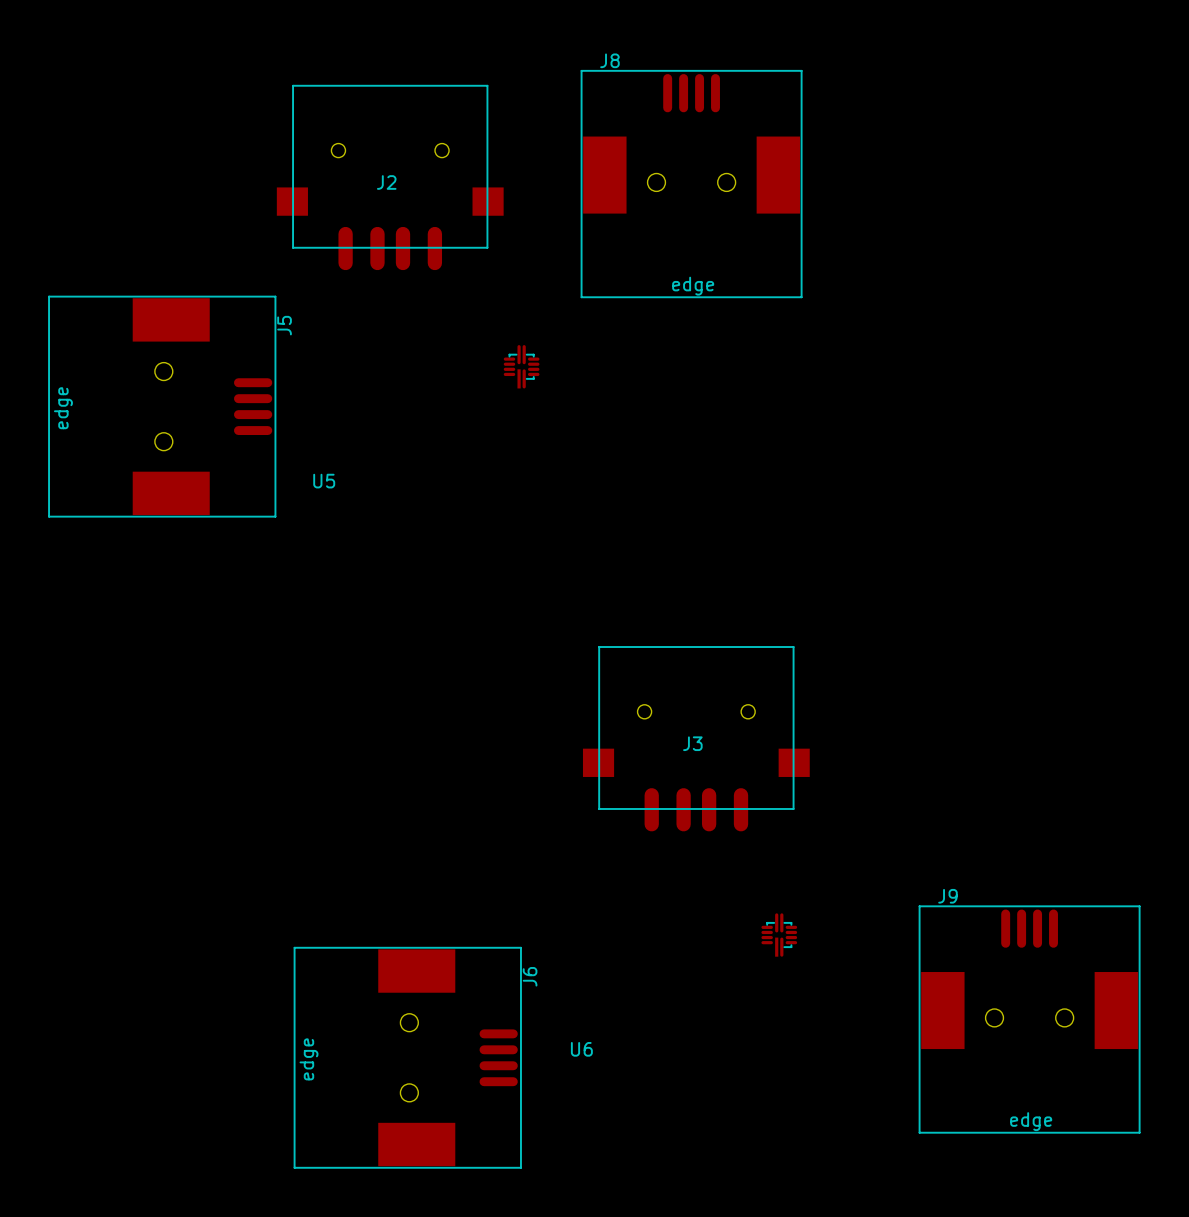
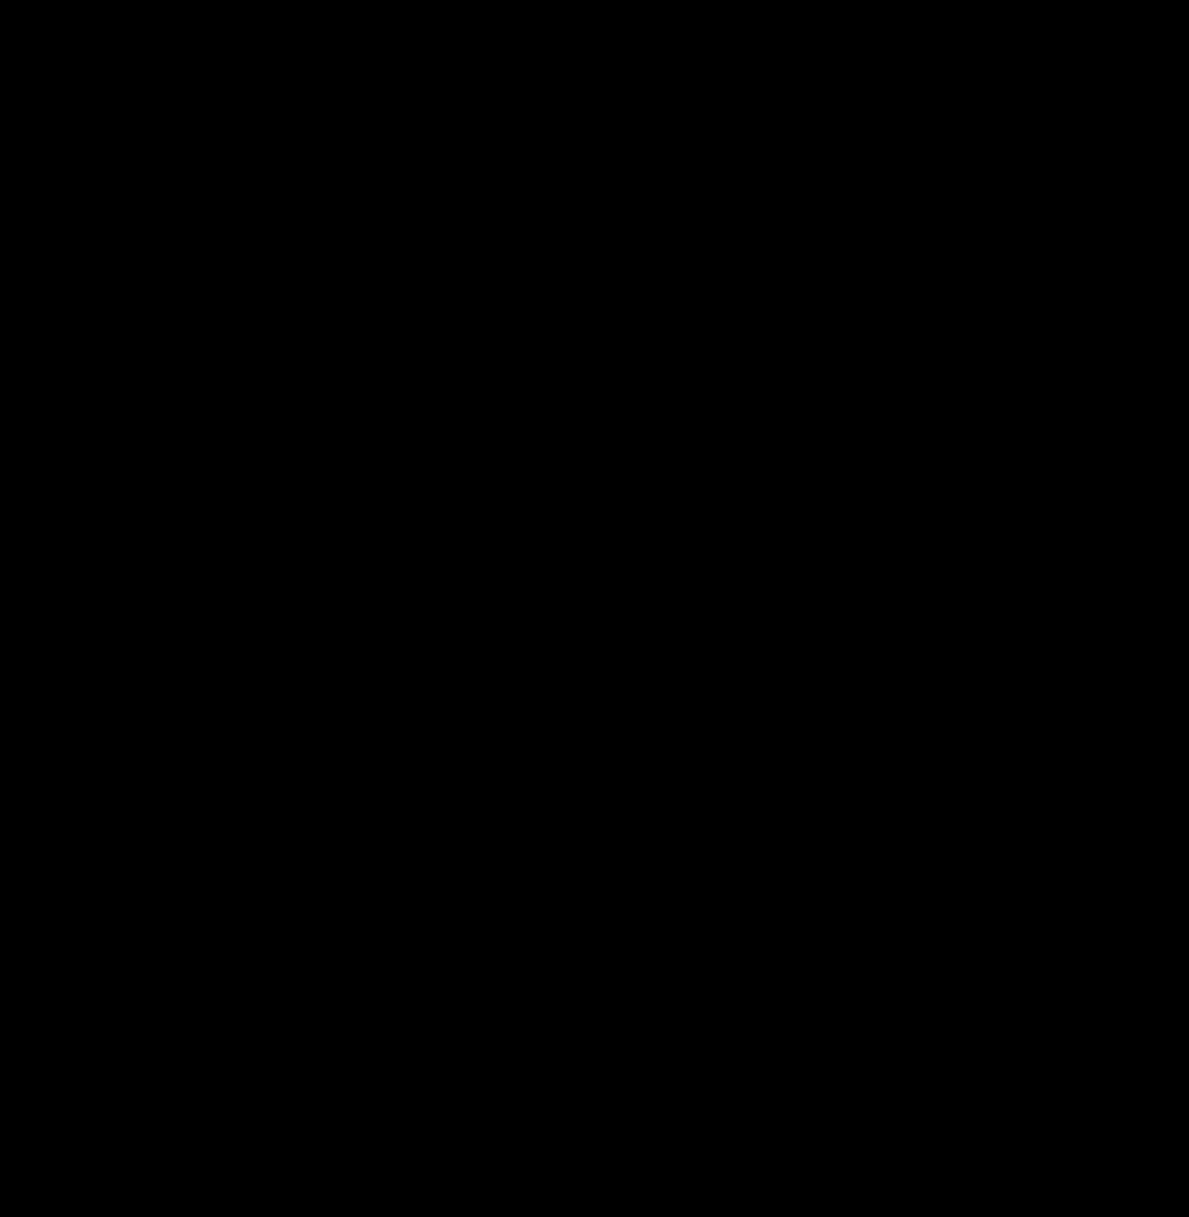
J2: (390, 177) -> none
J8: (691, 184) -> none
U5: (521, 366) -> none
J5: (162, 406) -> none
J3: (696, 738) -> none
U6: (779, 935) -> none
J9: (1029, 1019) -> none
J6: (407, 1057) -> none

